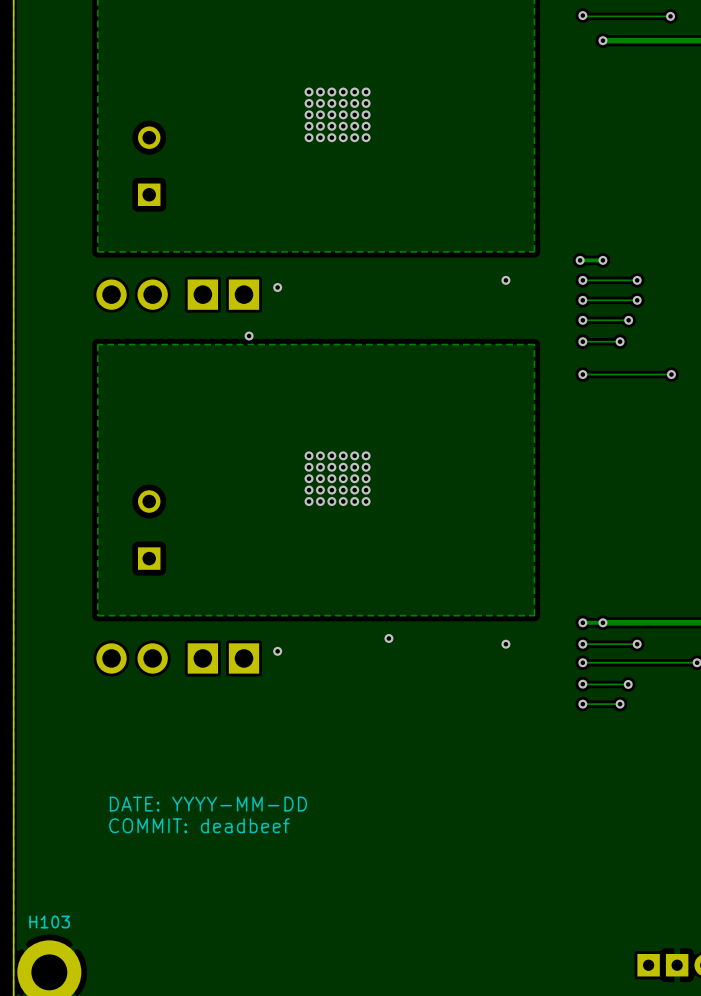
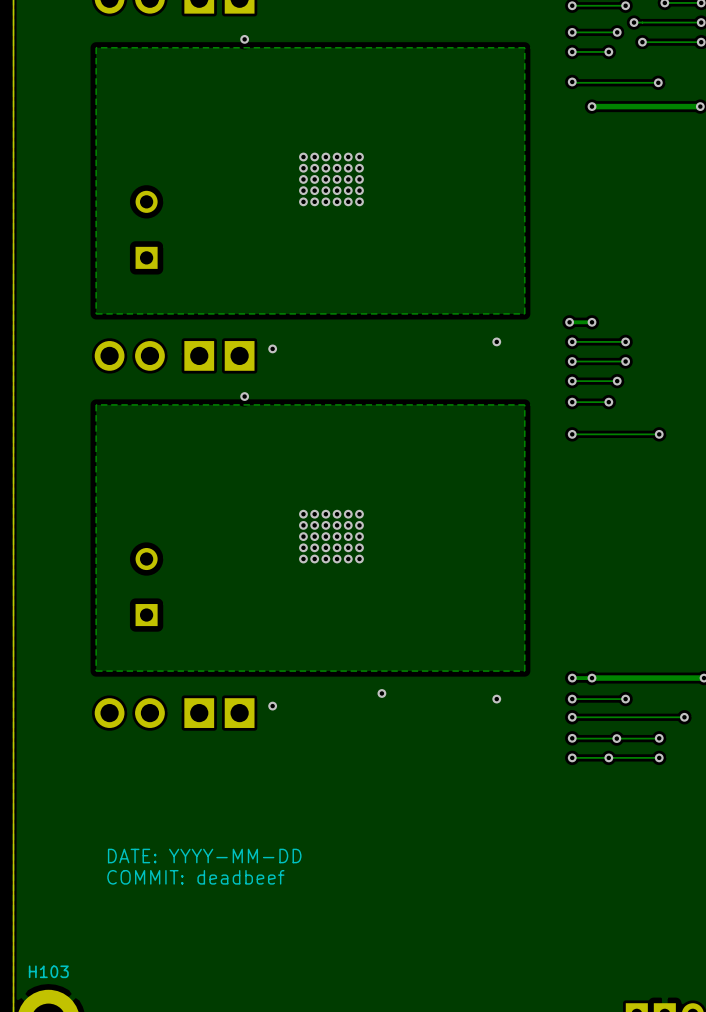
track: none -> (659, 738) (616, 738)
via: none -> (659, 738)
track: none -> (659, 757) (608, 757)
via: none -> (659, 757)

